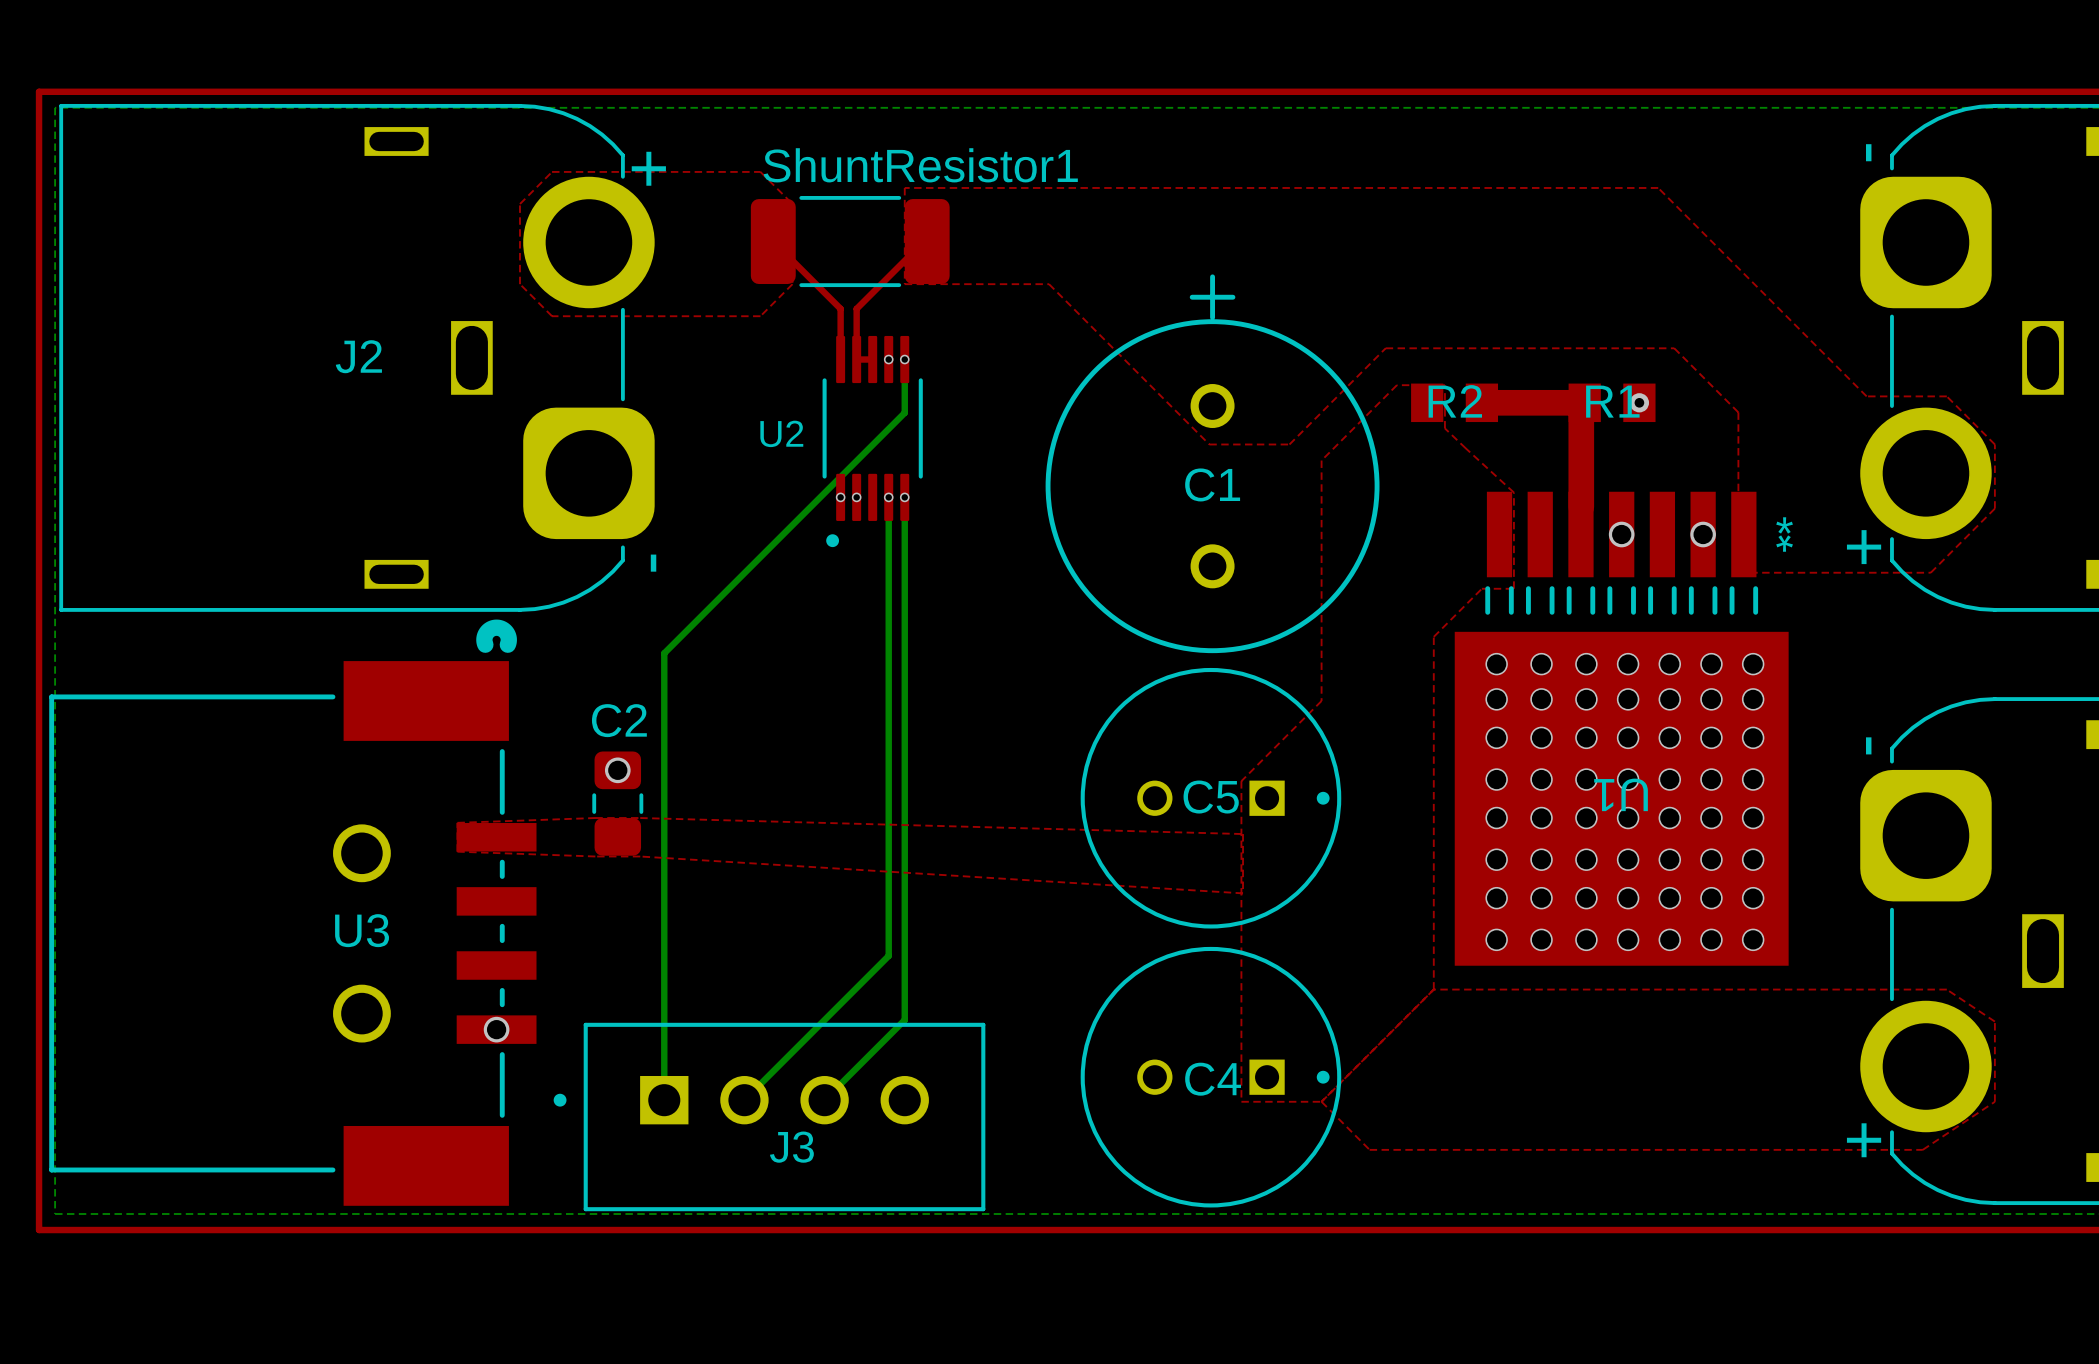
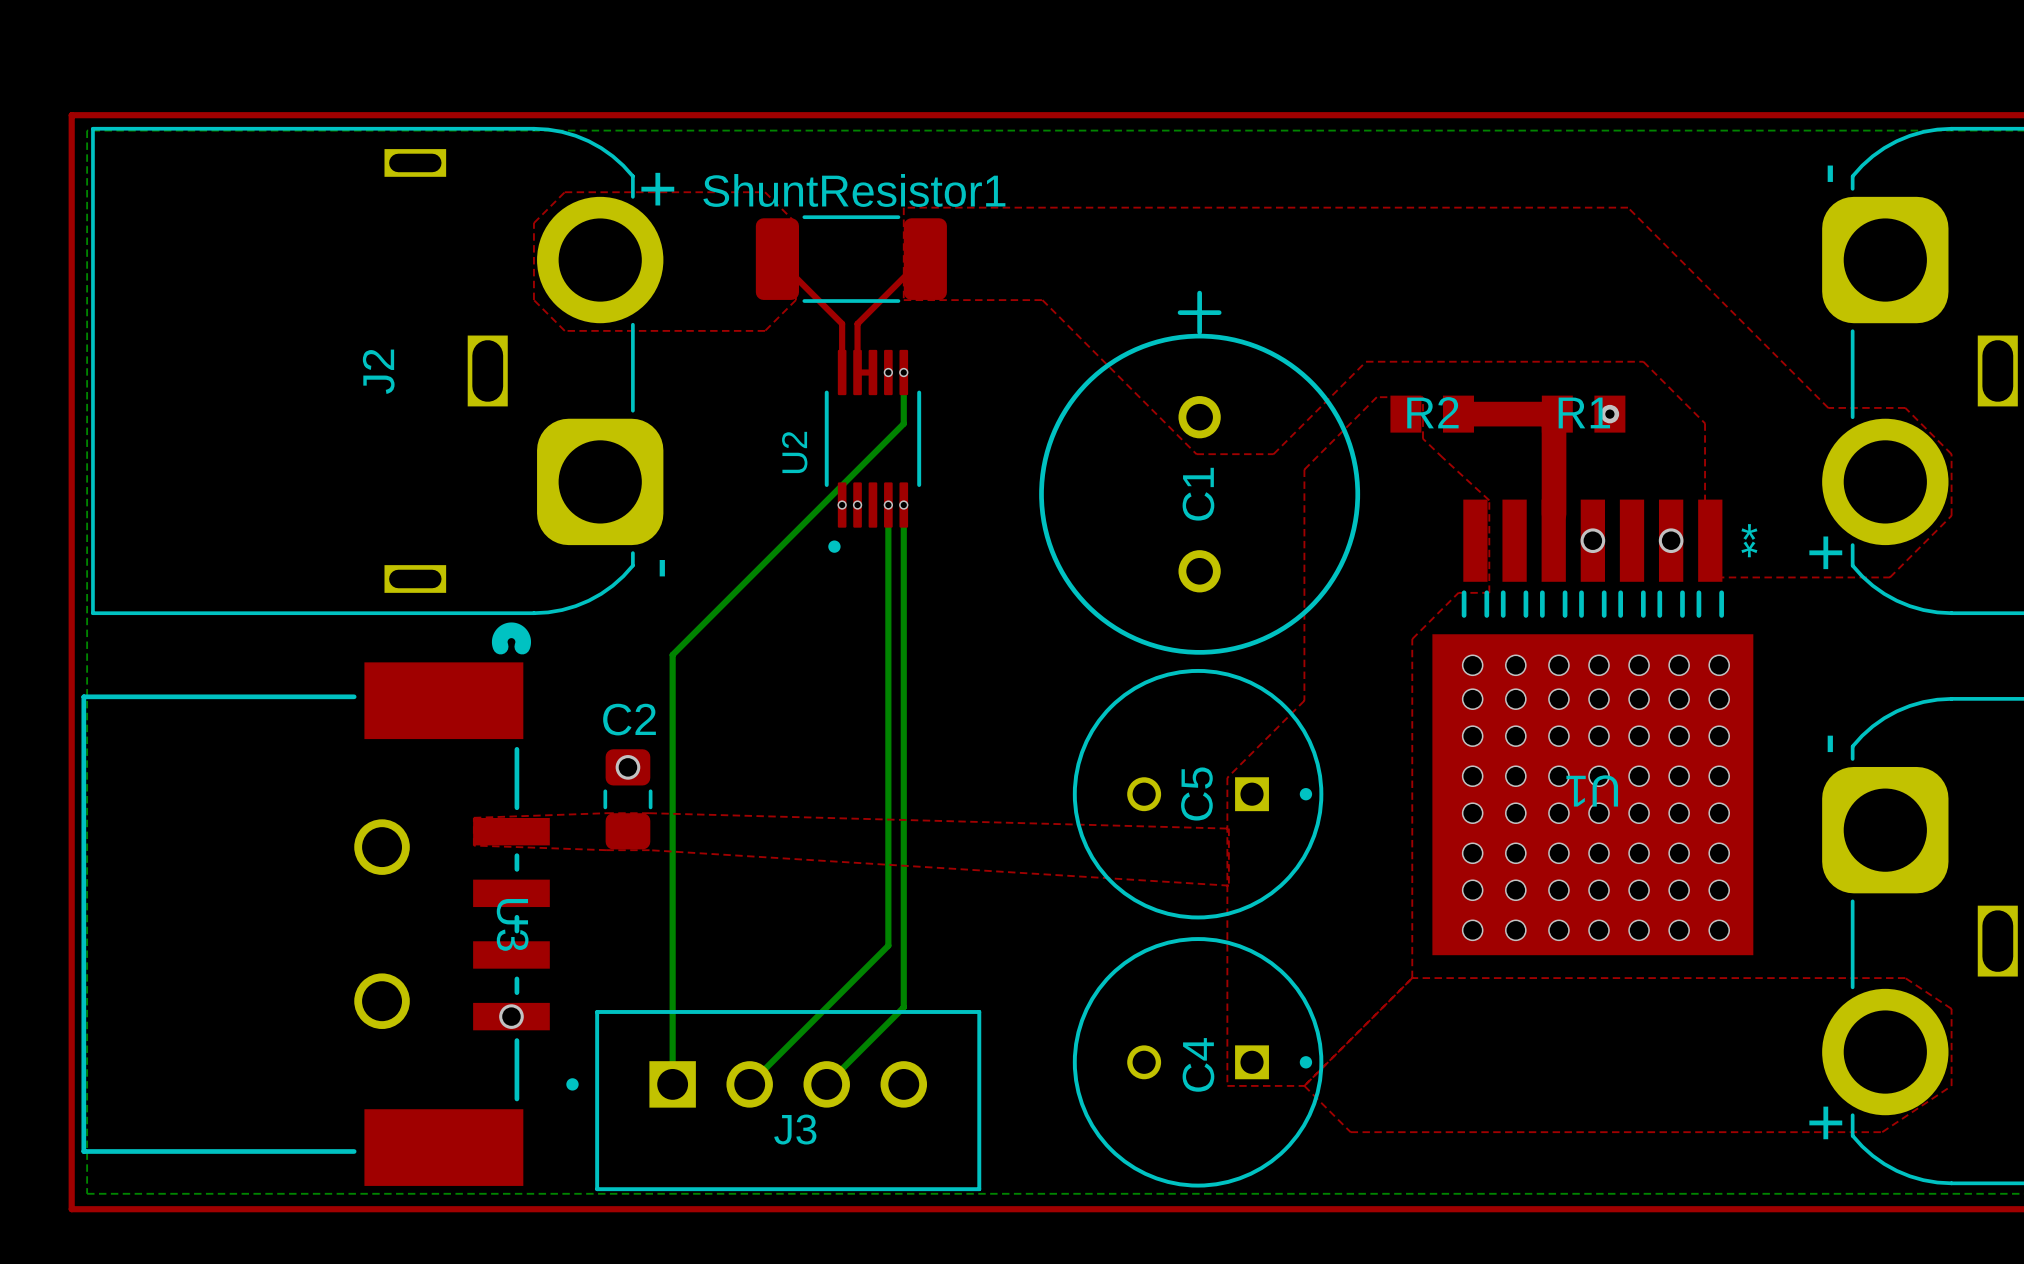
ShuntResistor1 name position: ShuntResistor1 (920, 165) -> ShuntResistor1 (854, 190)
J2 name rotation: 0° (358, 356) -> 90° counterclockwise (378, 371)
U2 name rotation: 0° (781, 433) -> 90° counterclockwise (794, 452)
C1 name rotation: 0° (1212, 484) -> 90° counterclockwise (1198, 494)
C5 name rotation: 0° (1211, 797) -> 90° counterclockwise (1196, 794)
U3 name rotation: 0° (362, 930) -> 90° clockwise (512, 924)
U3 name position: U3 (362, 930) -> U3 (512, 924)
C4 name rotation: 0° (1213, 1079) -> 90° counterclockwise (1198, 1064)

